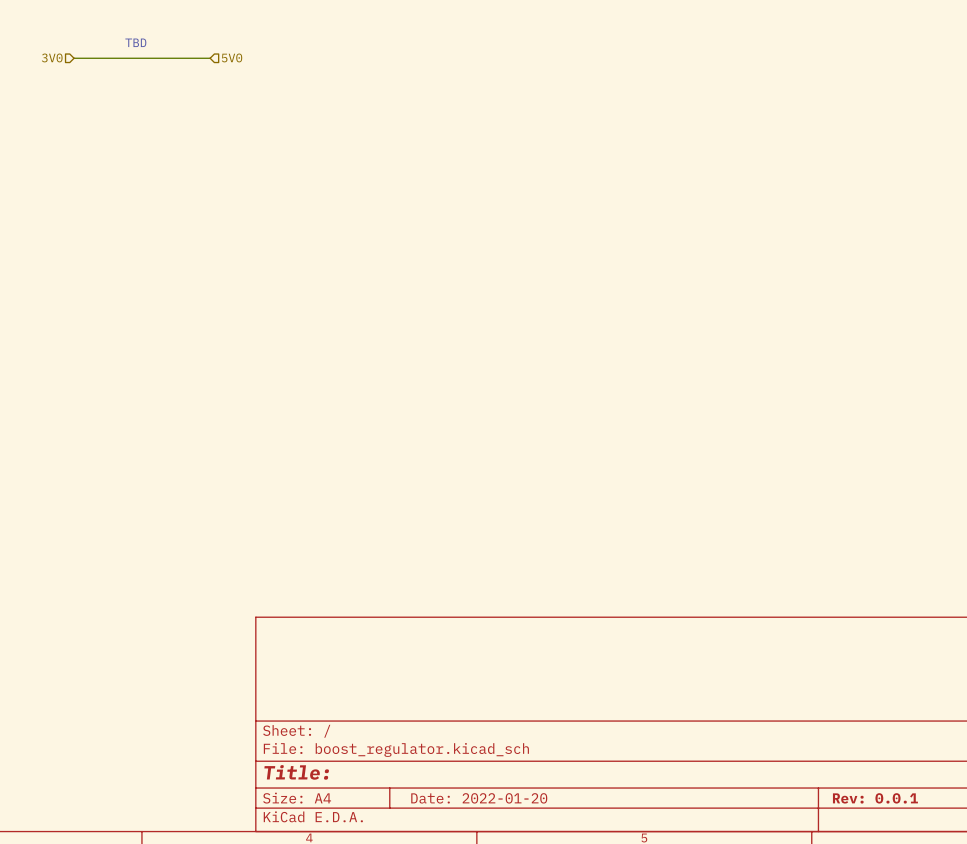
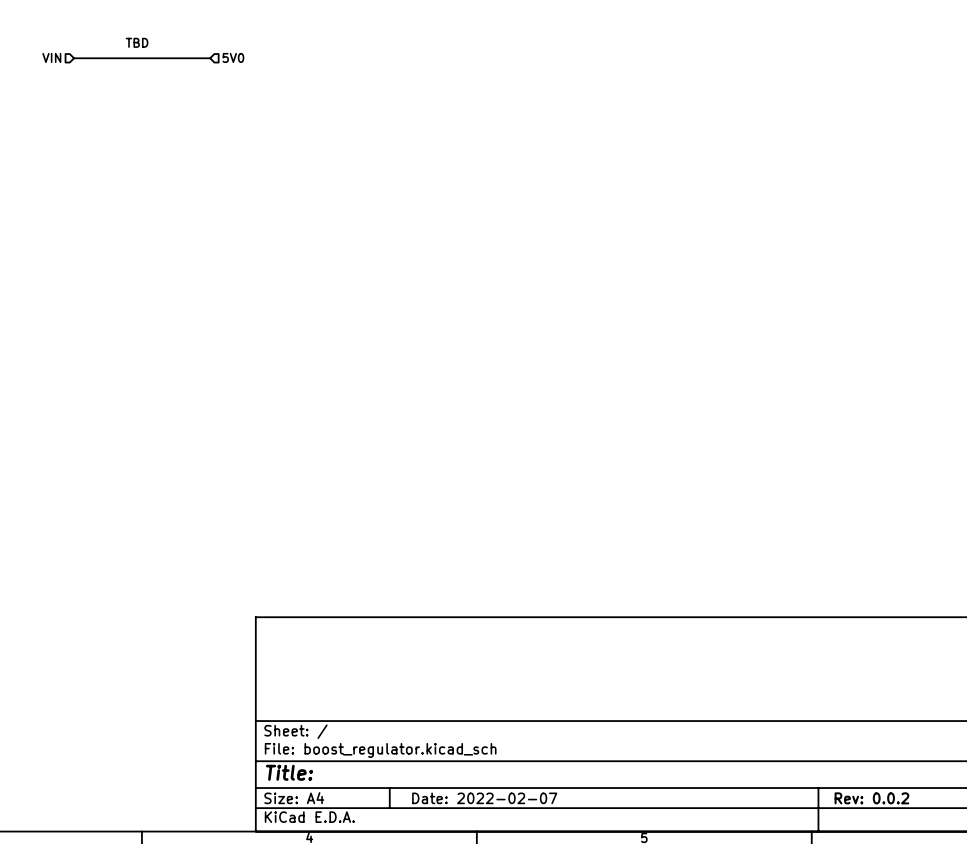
hierarchical label: 3V0 (52, 57) -> VIN (51, 57)
title block: Date: 2022-01-20 (479, 798) -> Date: 2022-02-07 (484, 798)
title block: Rev: 0.0.1 (875, 798) -> Rev: 0.0.2 (871, 798)

